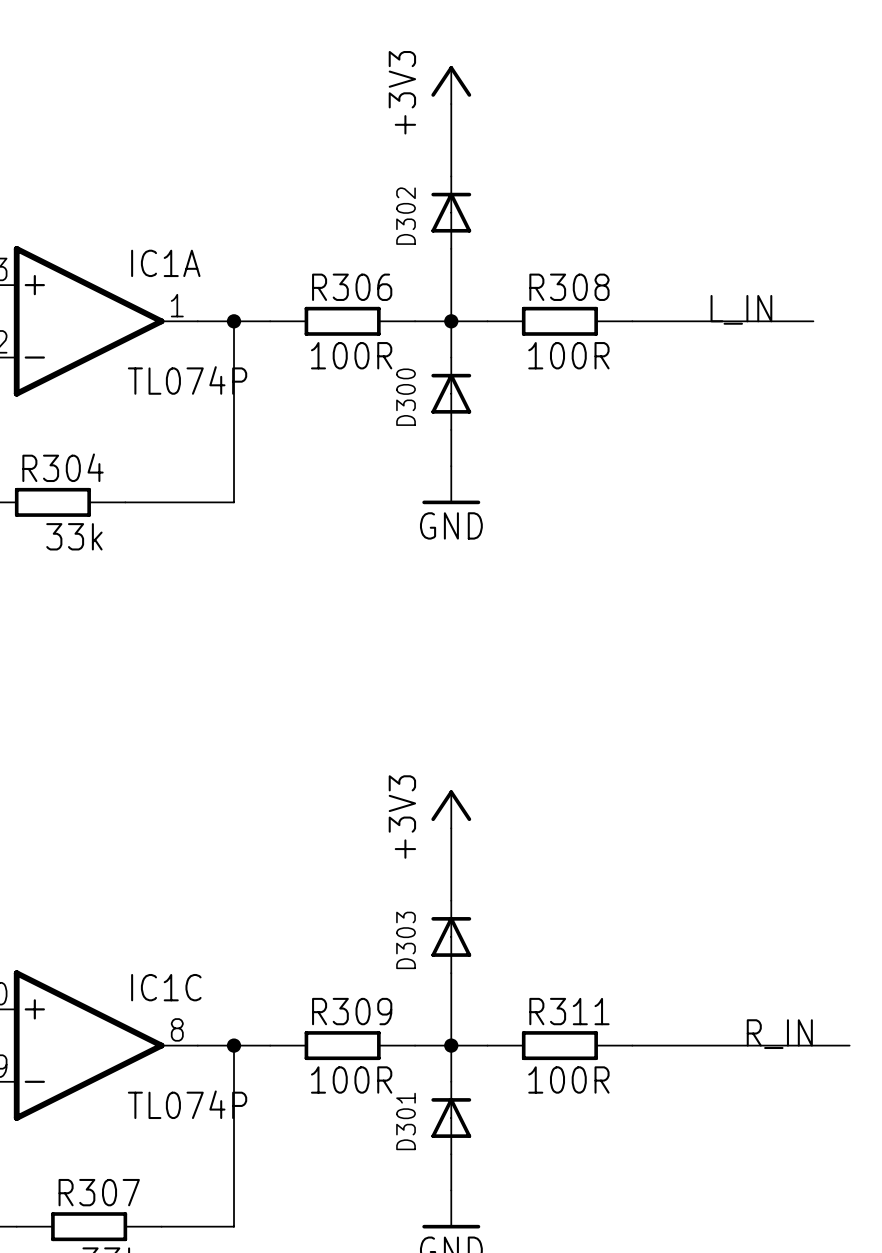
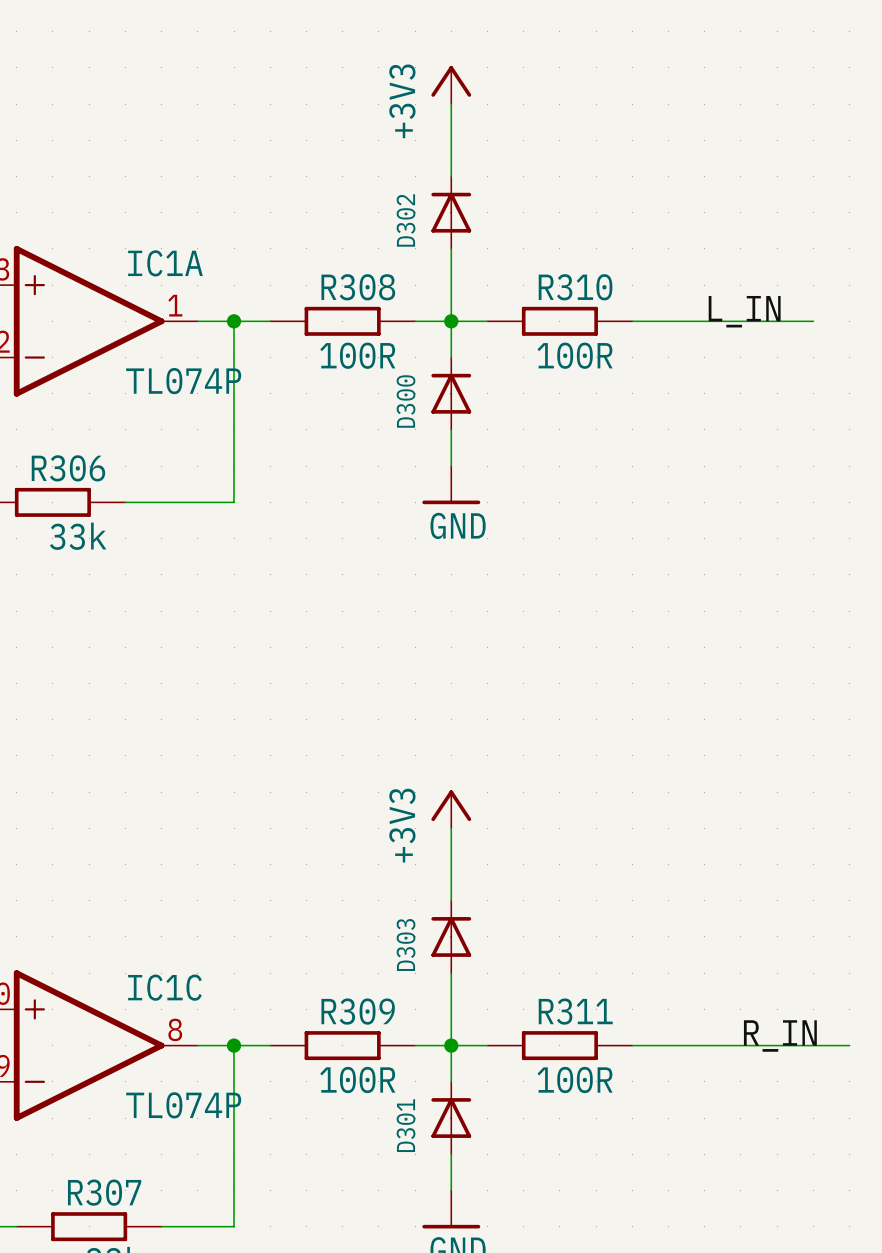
R306 name: R306 (352, 287) -> R308 (358, 287)
R308 name: R308 (569, 287) -> R310 (575, 287)
R304 name: R304 (63, 467) -> R306 (68, 468)

